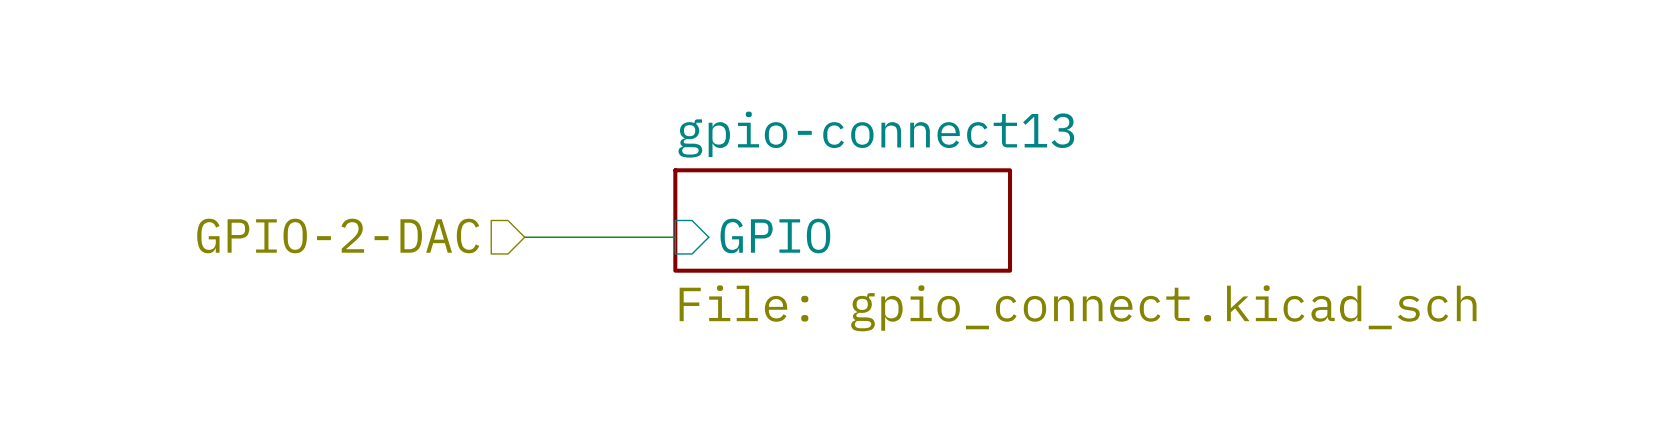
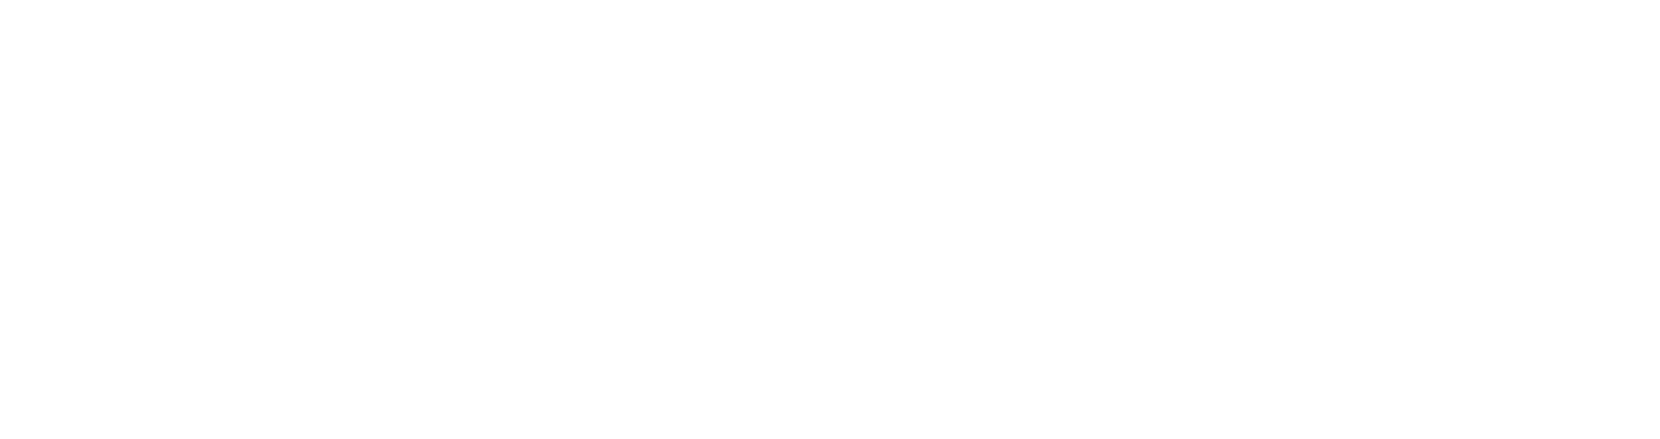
sheet gpio-connect13: File: gpio_connect.kicad_sch (842, 220) -> none
hierarchical label: GPIO-2-DAC (338, 235) -> none
sheet pin: GPIO (775, 235) -> none
wire: (524, 237) (675, 237) -> none

